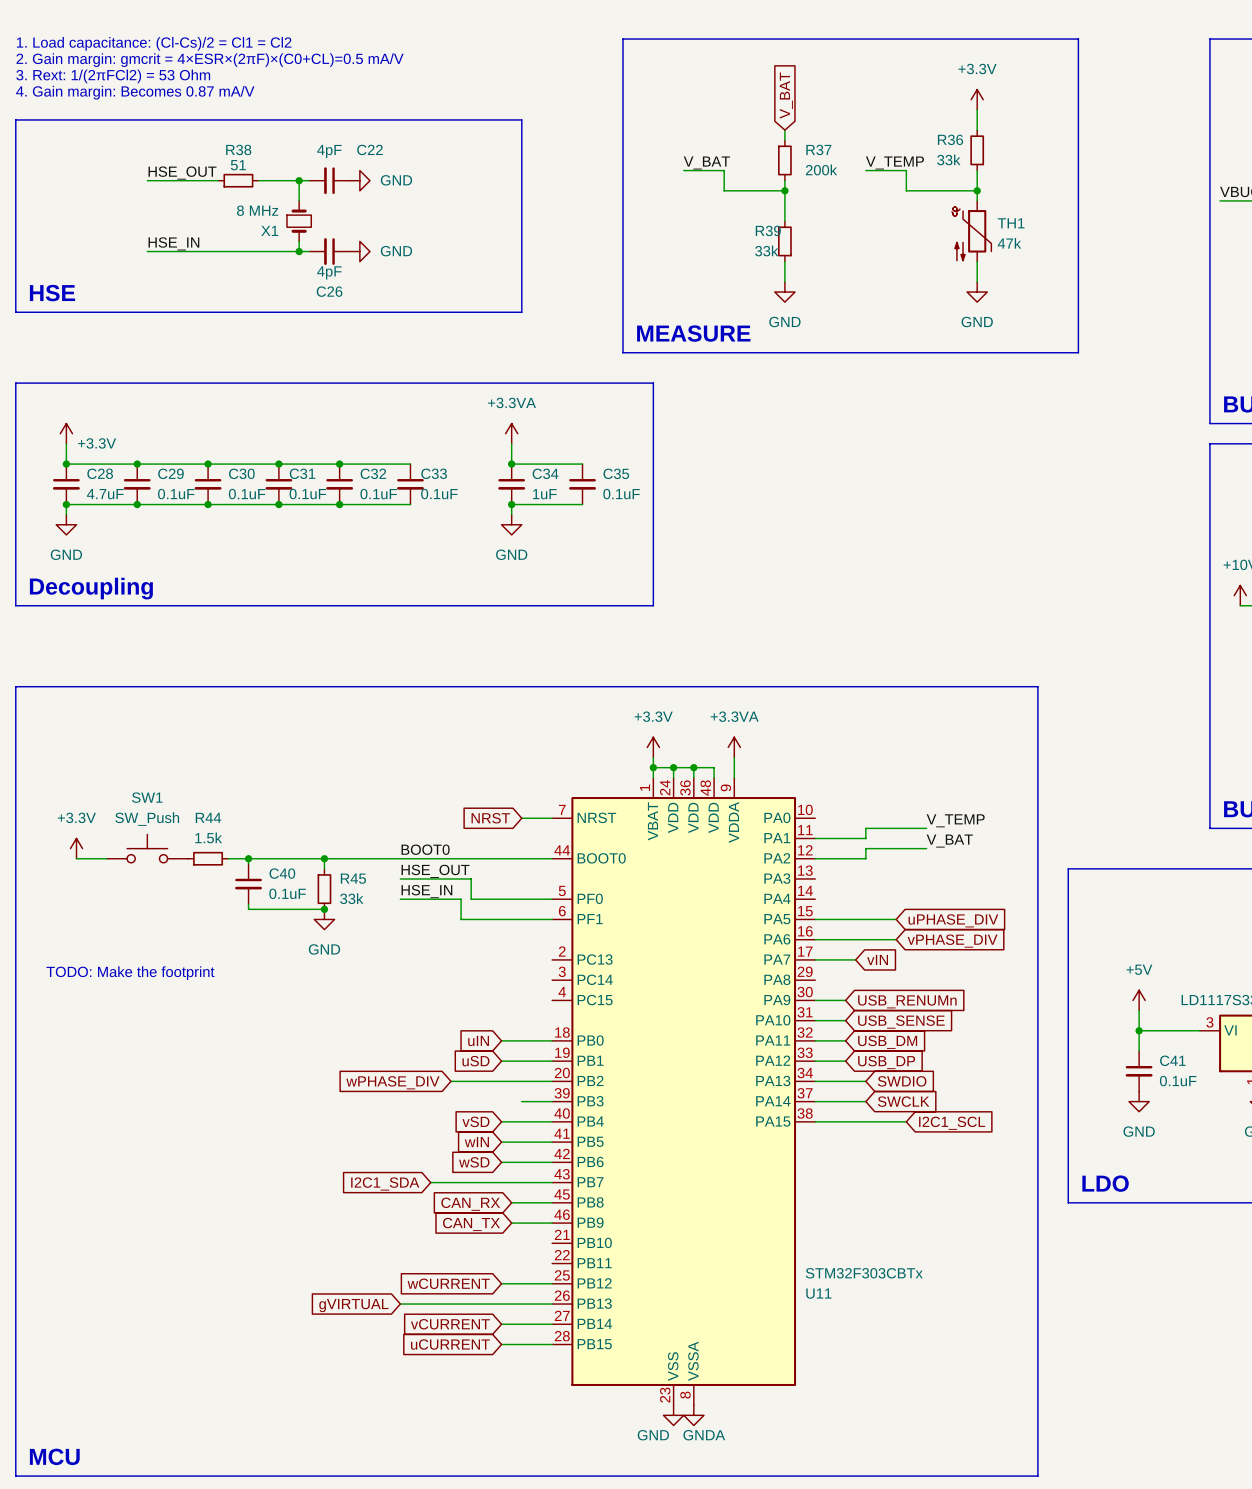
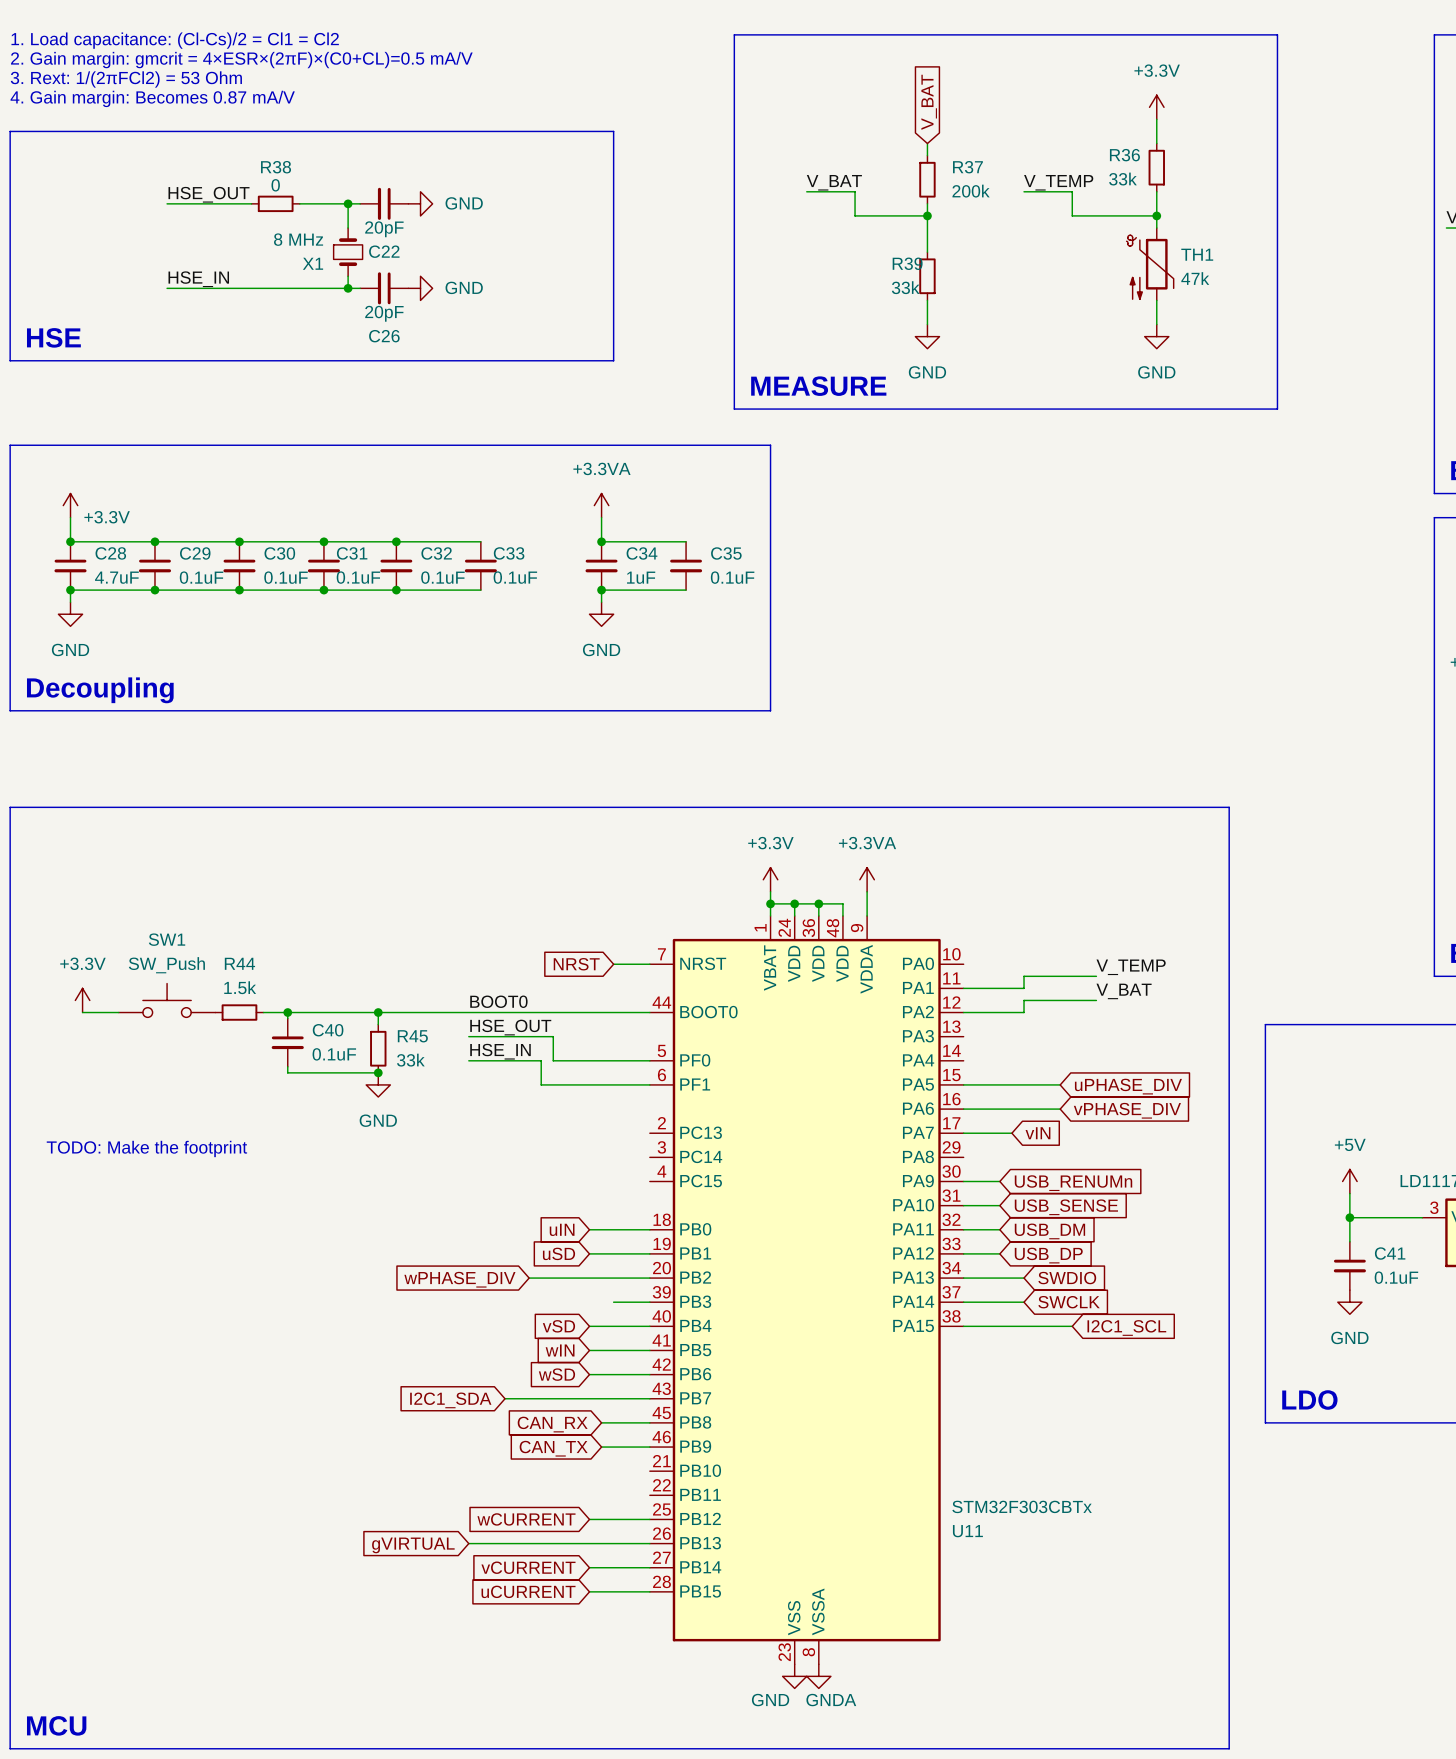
C22 name position: C22 (369, 149) -> C22 (384, 251)
C22 value: 4pF (329, 151) -> 20pF (384, 229)
R38 value: 51 (238, 165) -> 0 (275, 185)
C26 value: 4pF (329, 272) -> 20pF (384, 313)

